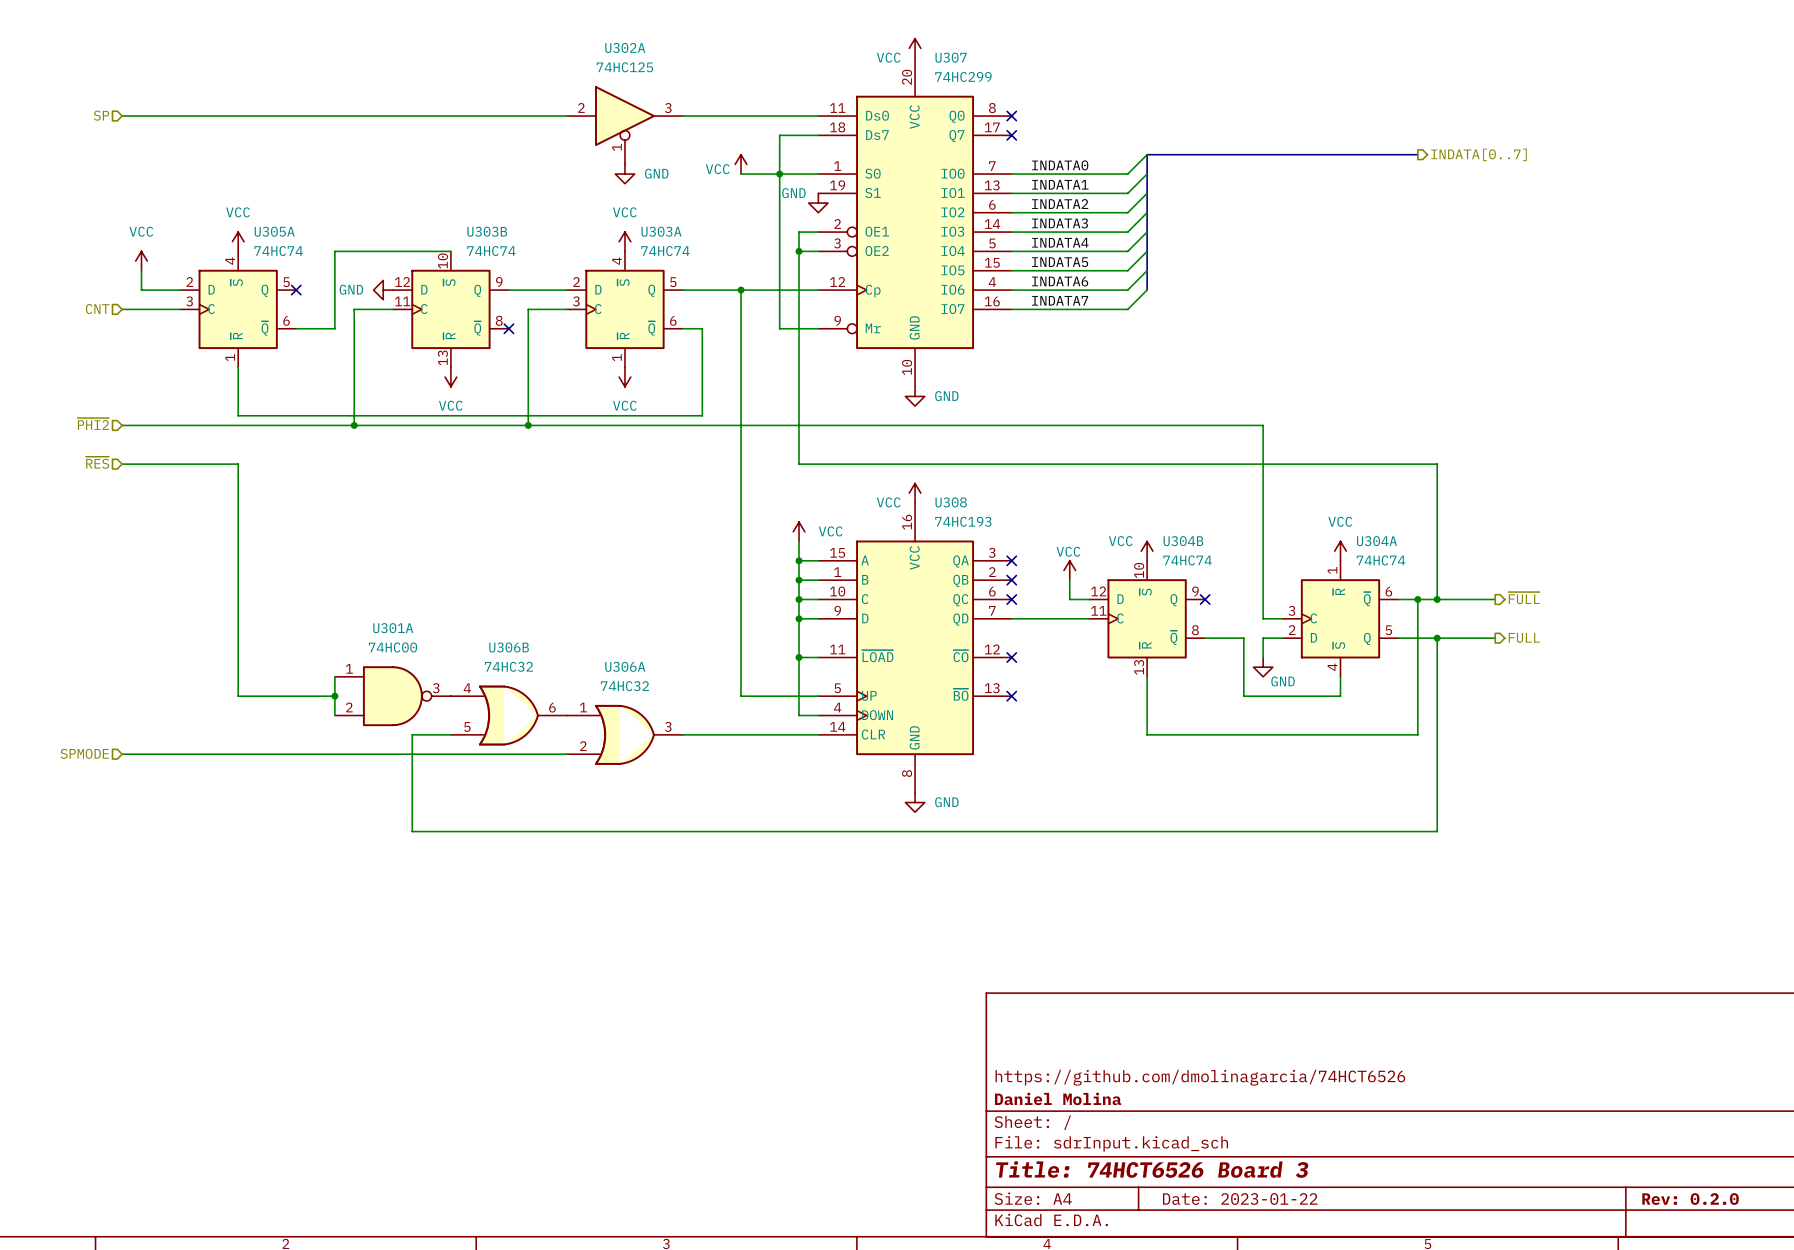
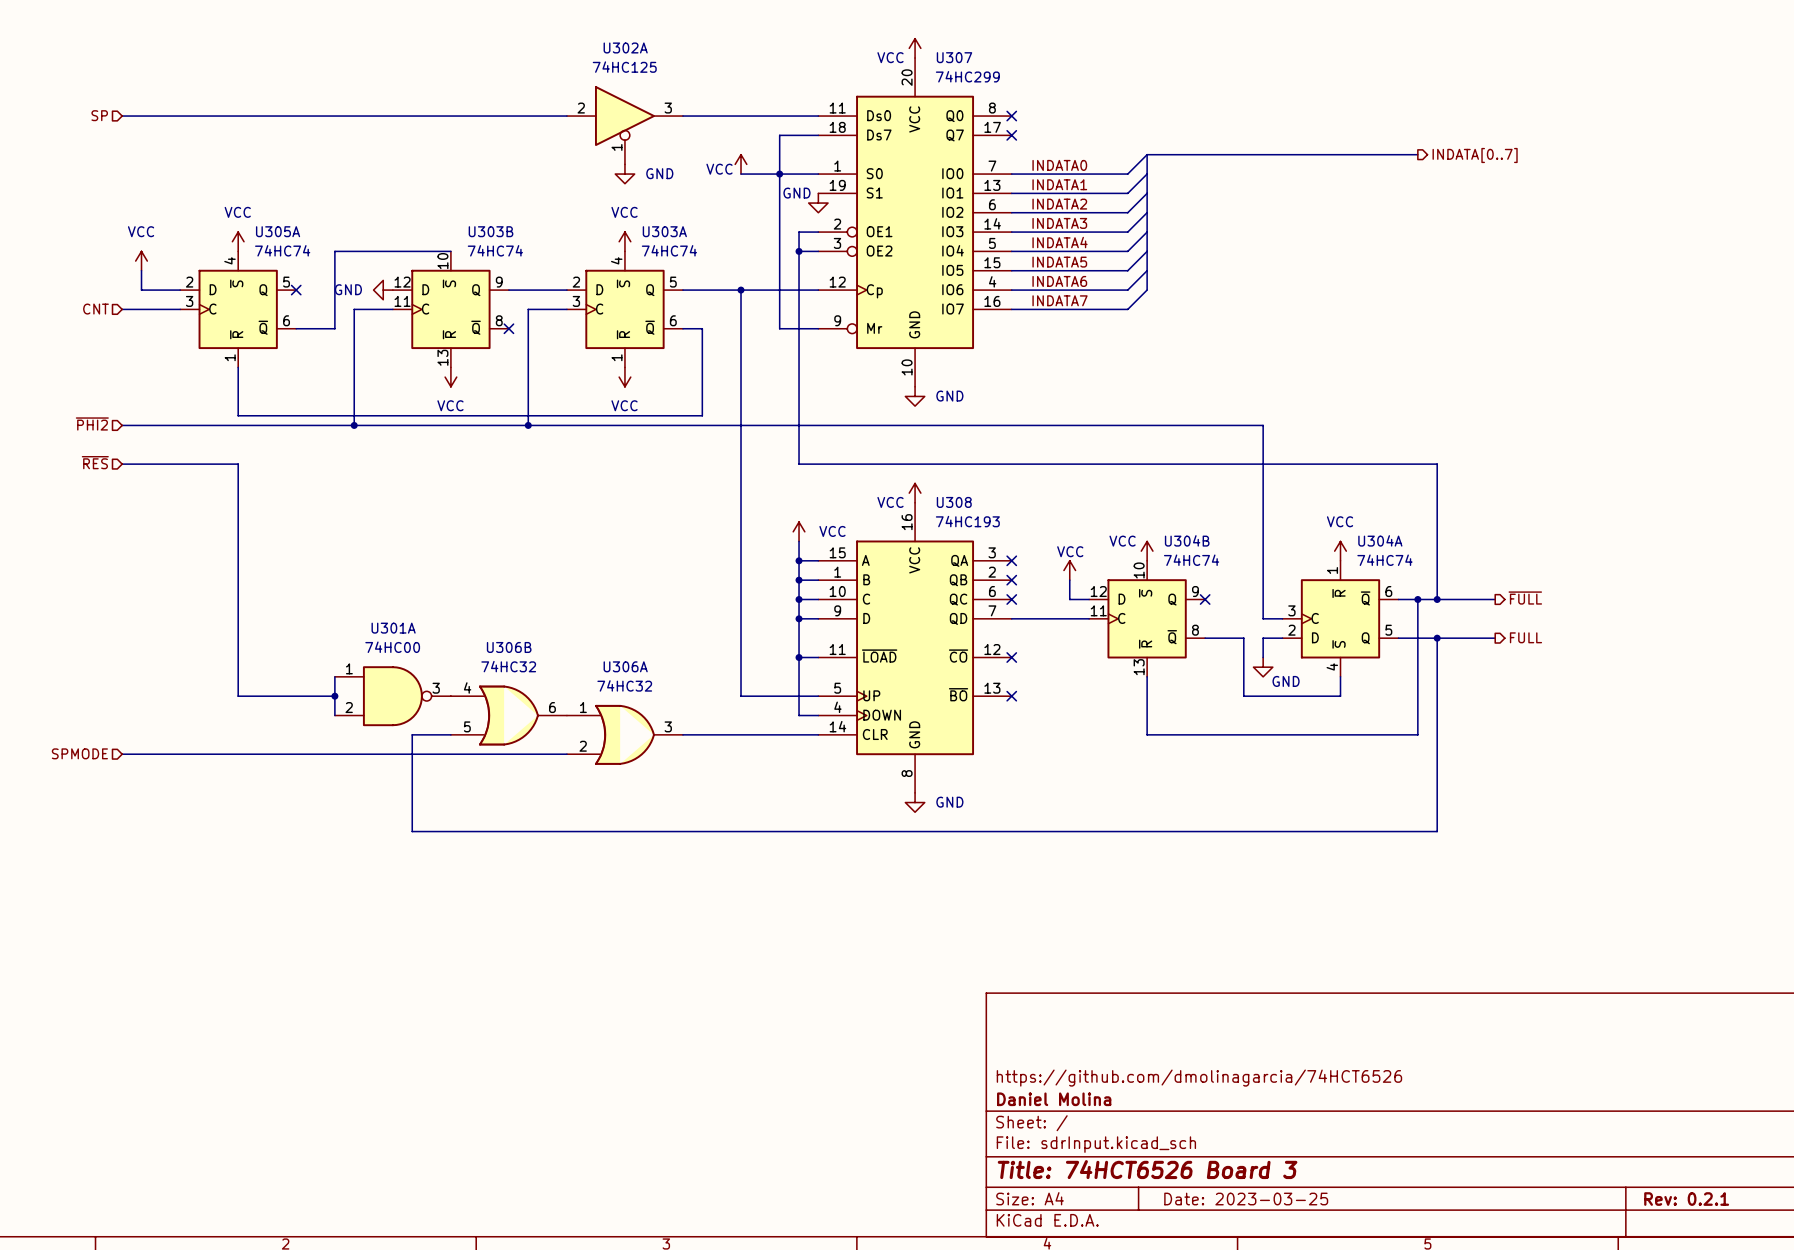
title block: Date: 2023-01-22 (1240, 1199) -> Date: 2023-03-25 (1246, 1199)
title block: Rev: 0.2.0 (1690, 1199) -> Rev: 0.2.1 (1686, 1199)

